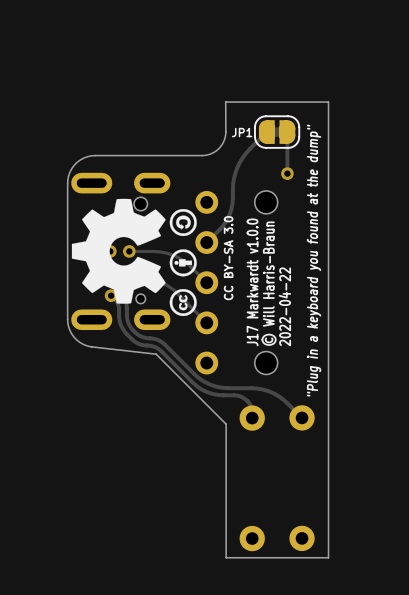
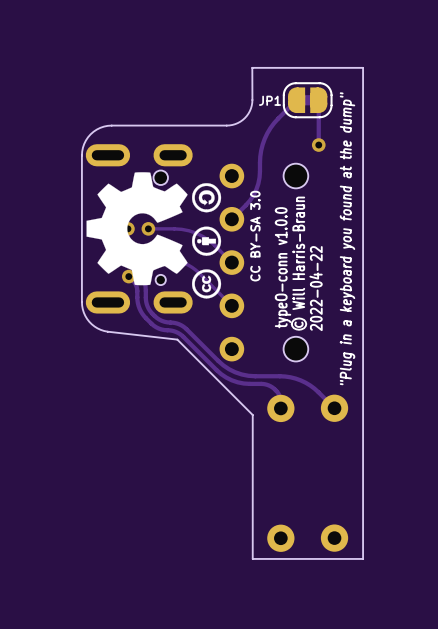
text: J17 Markwardt v1.0.0 (252, 282) -> typeO-conn v1.0.0 (283, 267)

